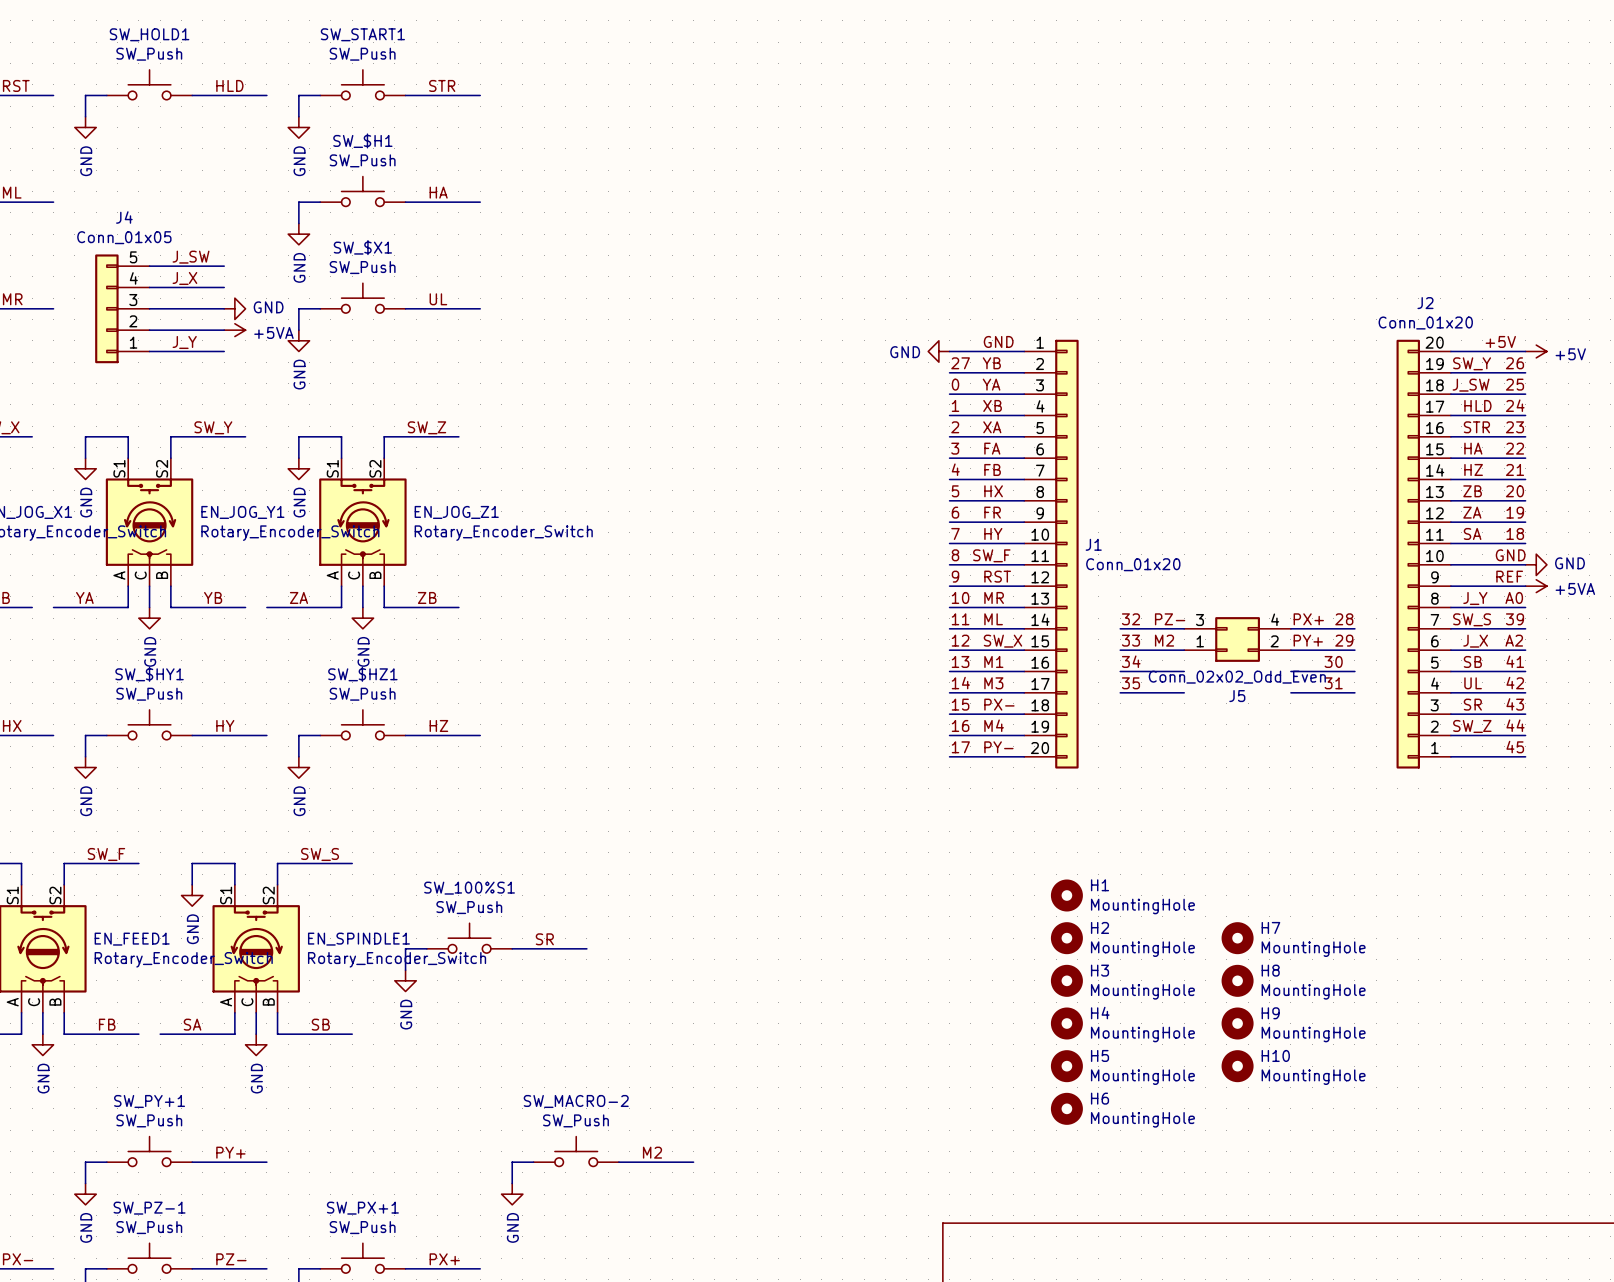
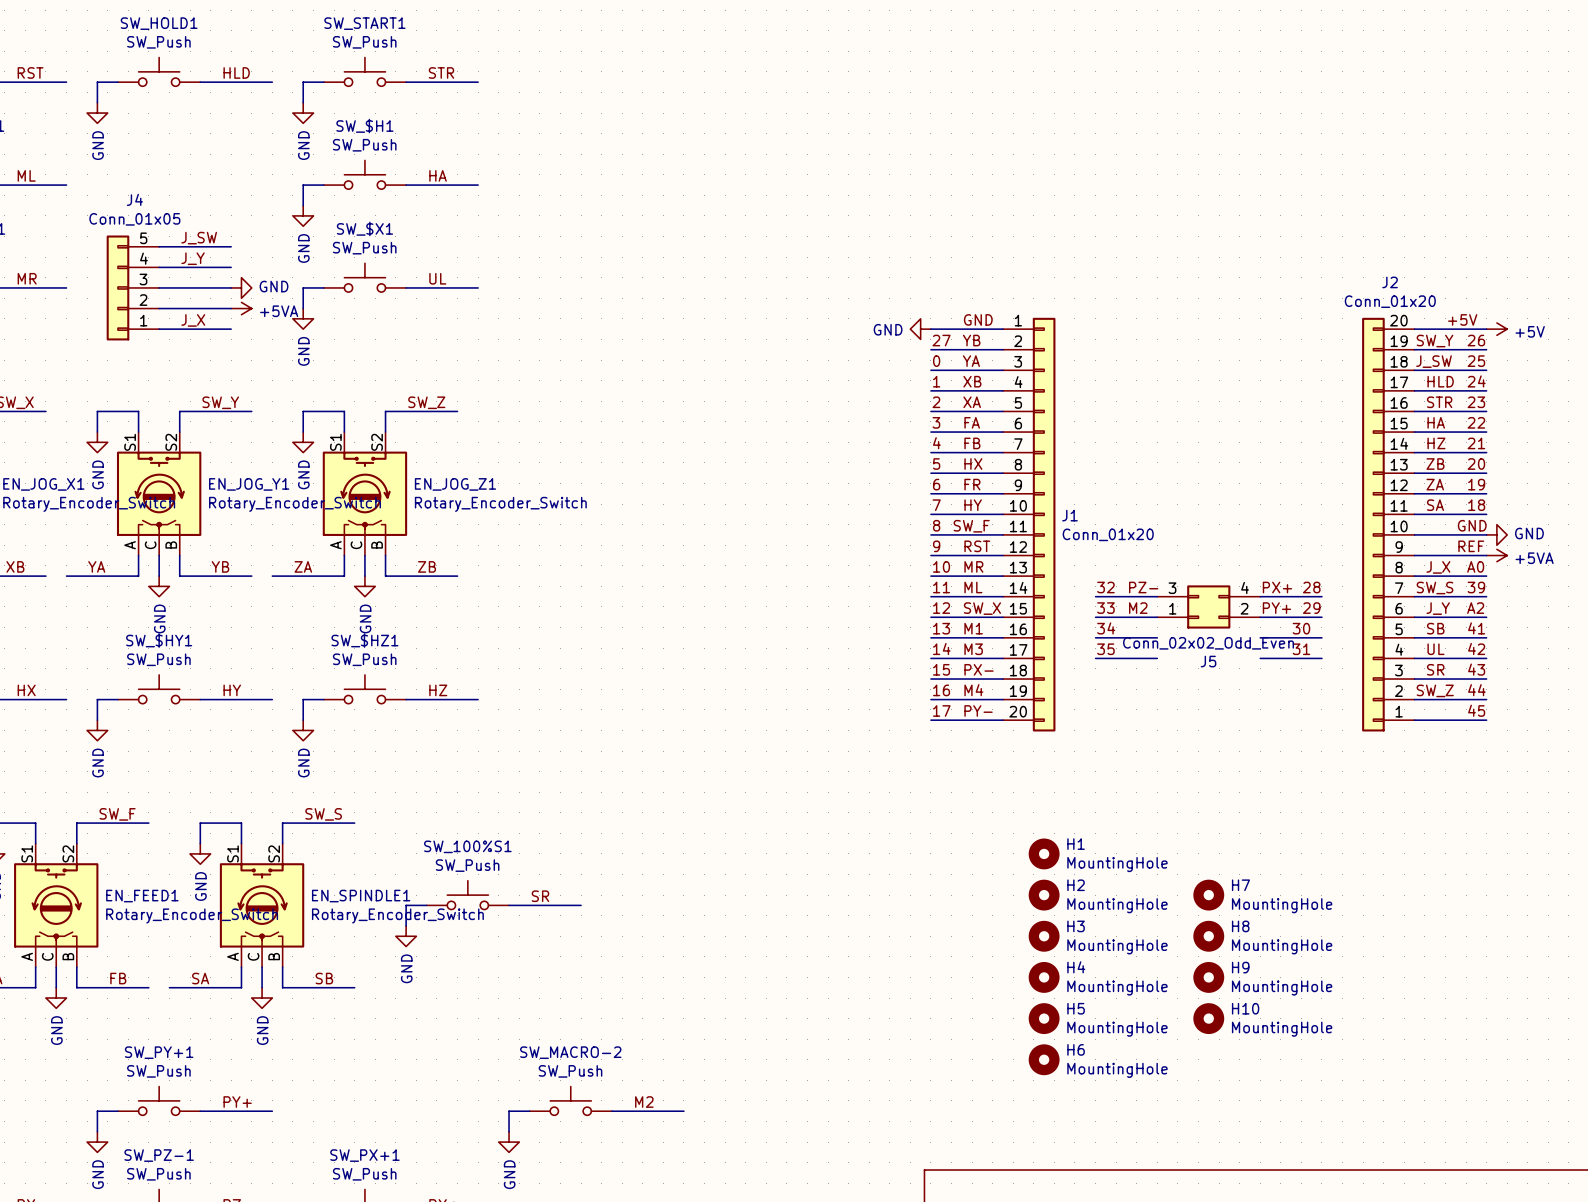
label: J_X (184, 278) -> J_Y (193, 258)
label: J_Y (184, 342) -> J_X (193, 320)
label: J_Y (1475, 598) -> J_X (1438, 567)
label: J_X (1475, 641) -> J_Y (1438, 608)

